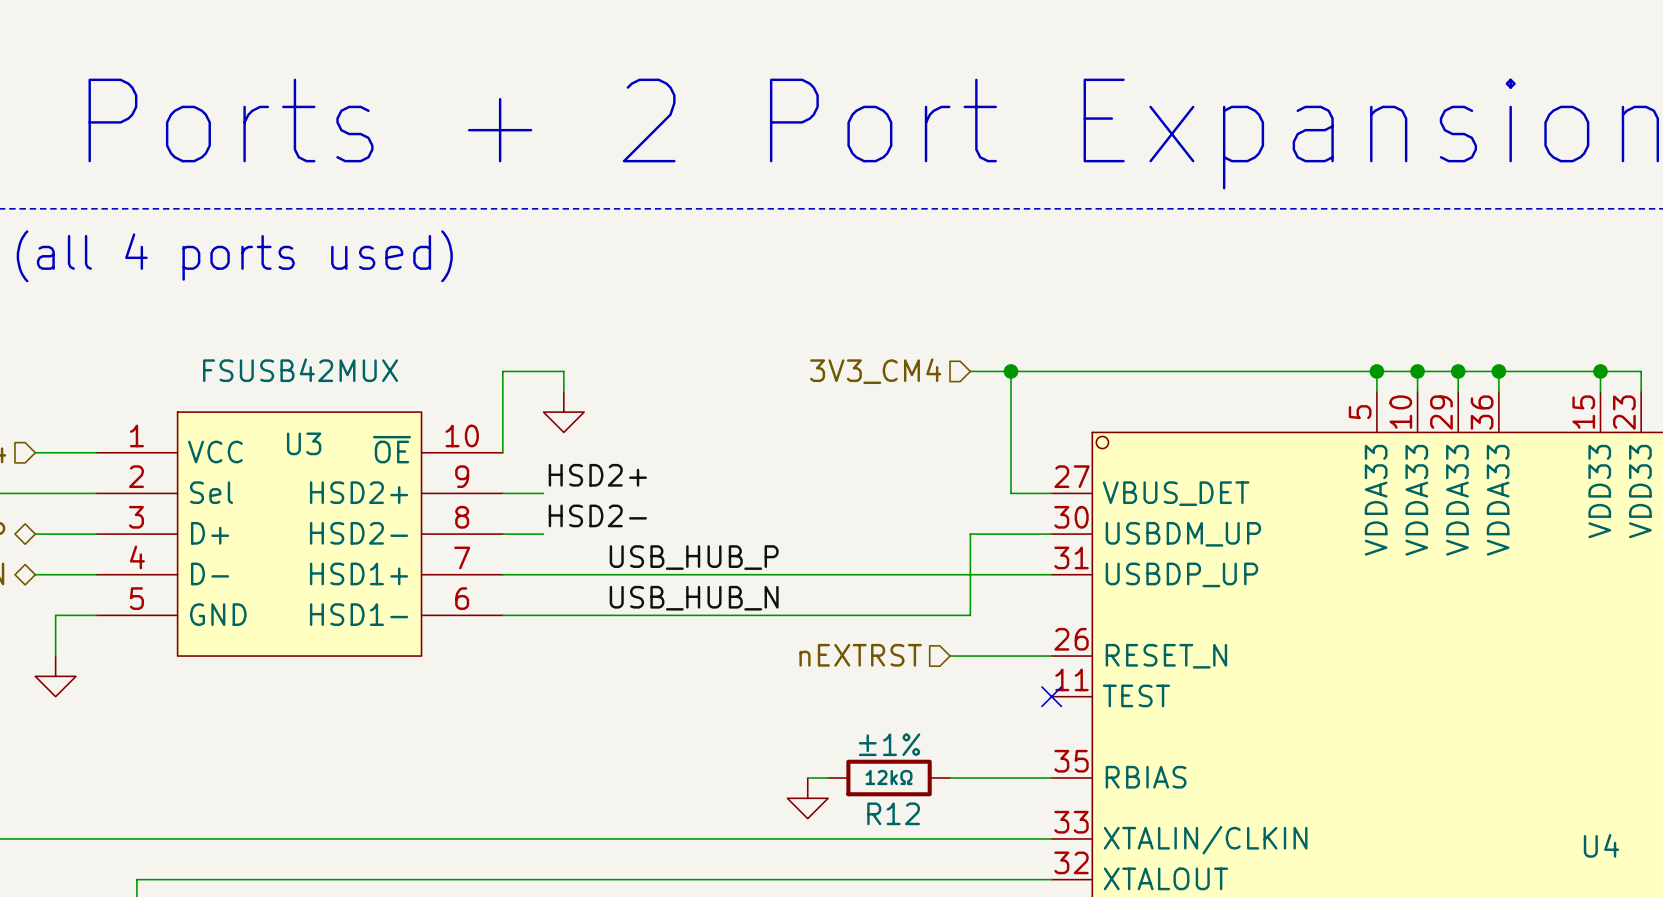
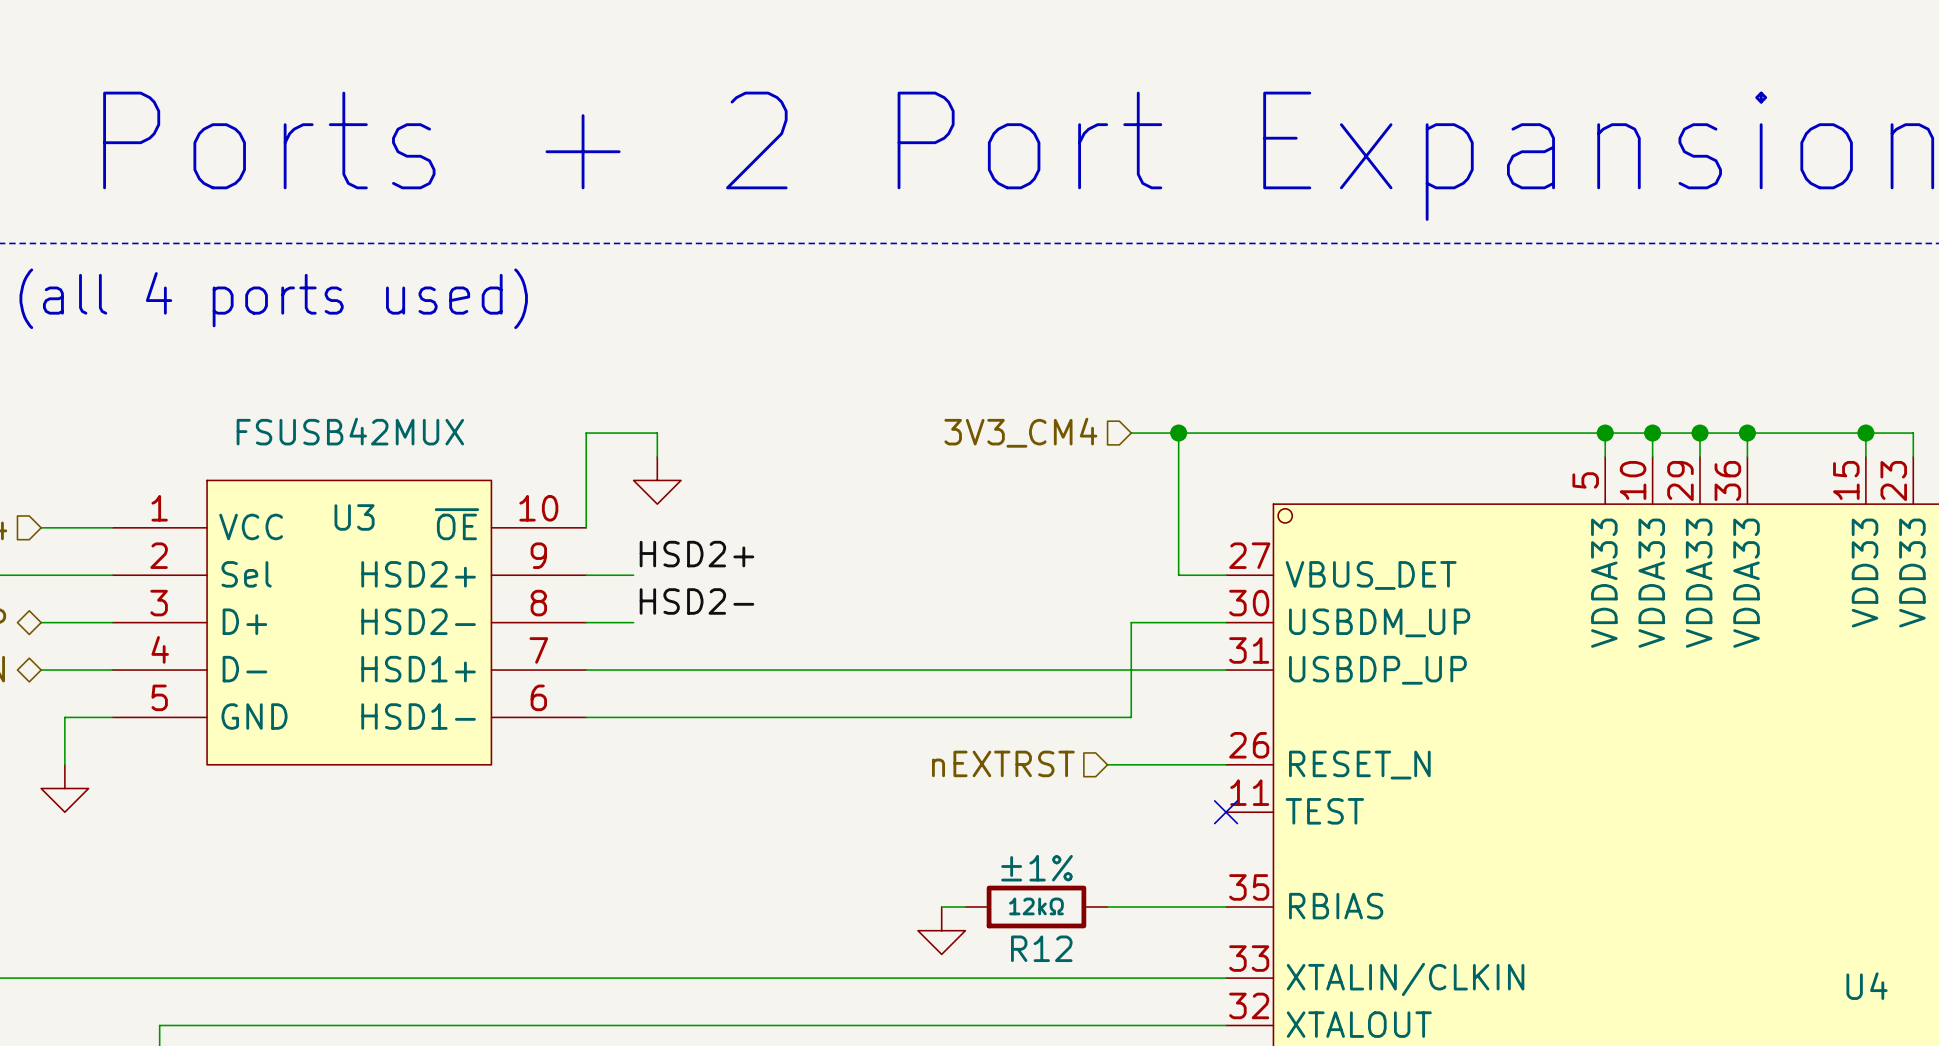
label: USB_HUB_P (694, 557) -> none
label: USB_HUB_N (694, 598) -> none

